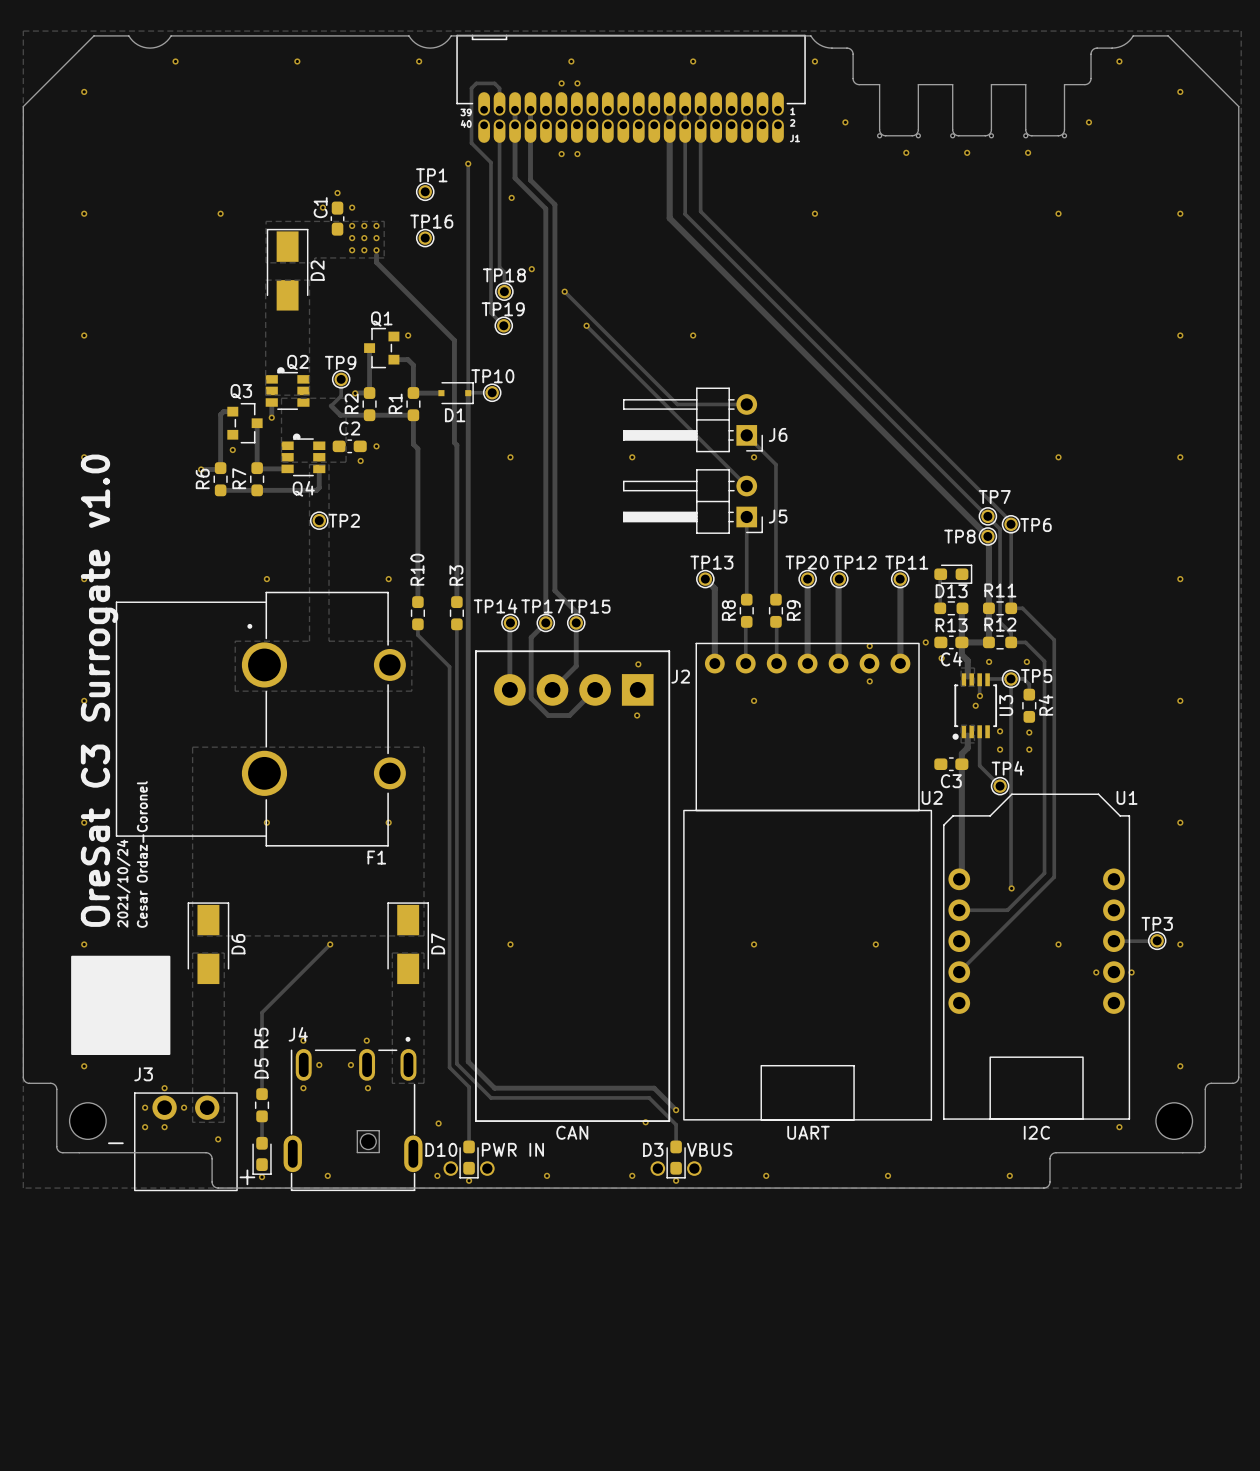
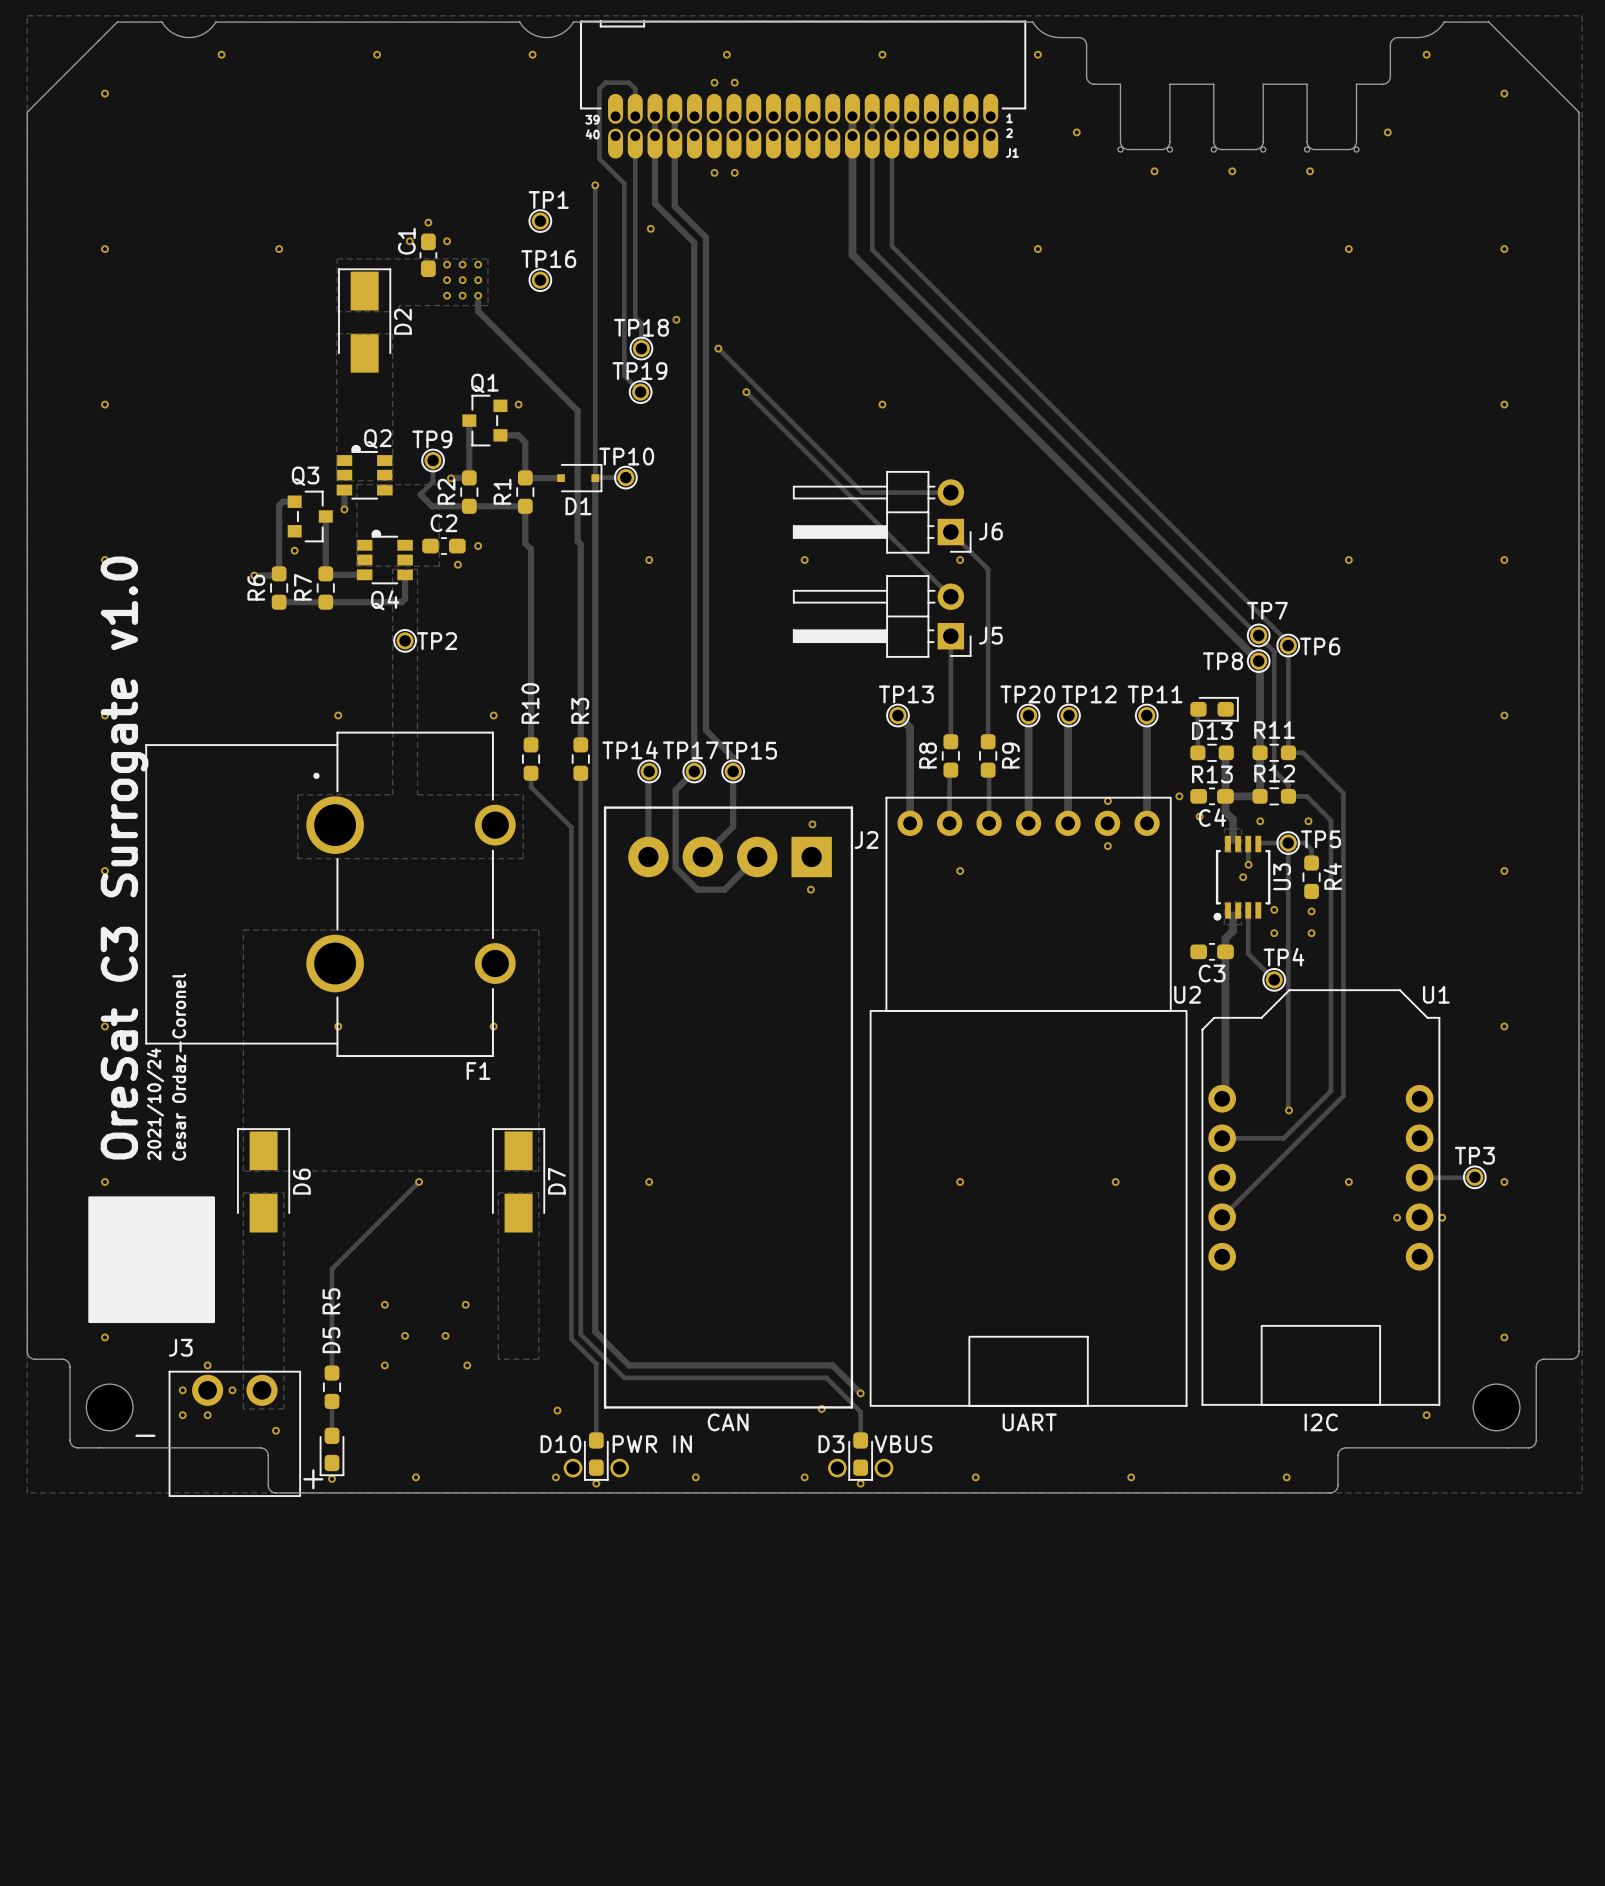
J4: (353, 1113) -> none

